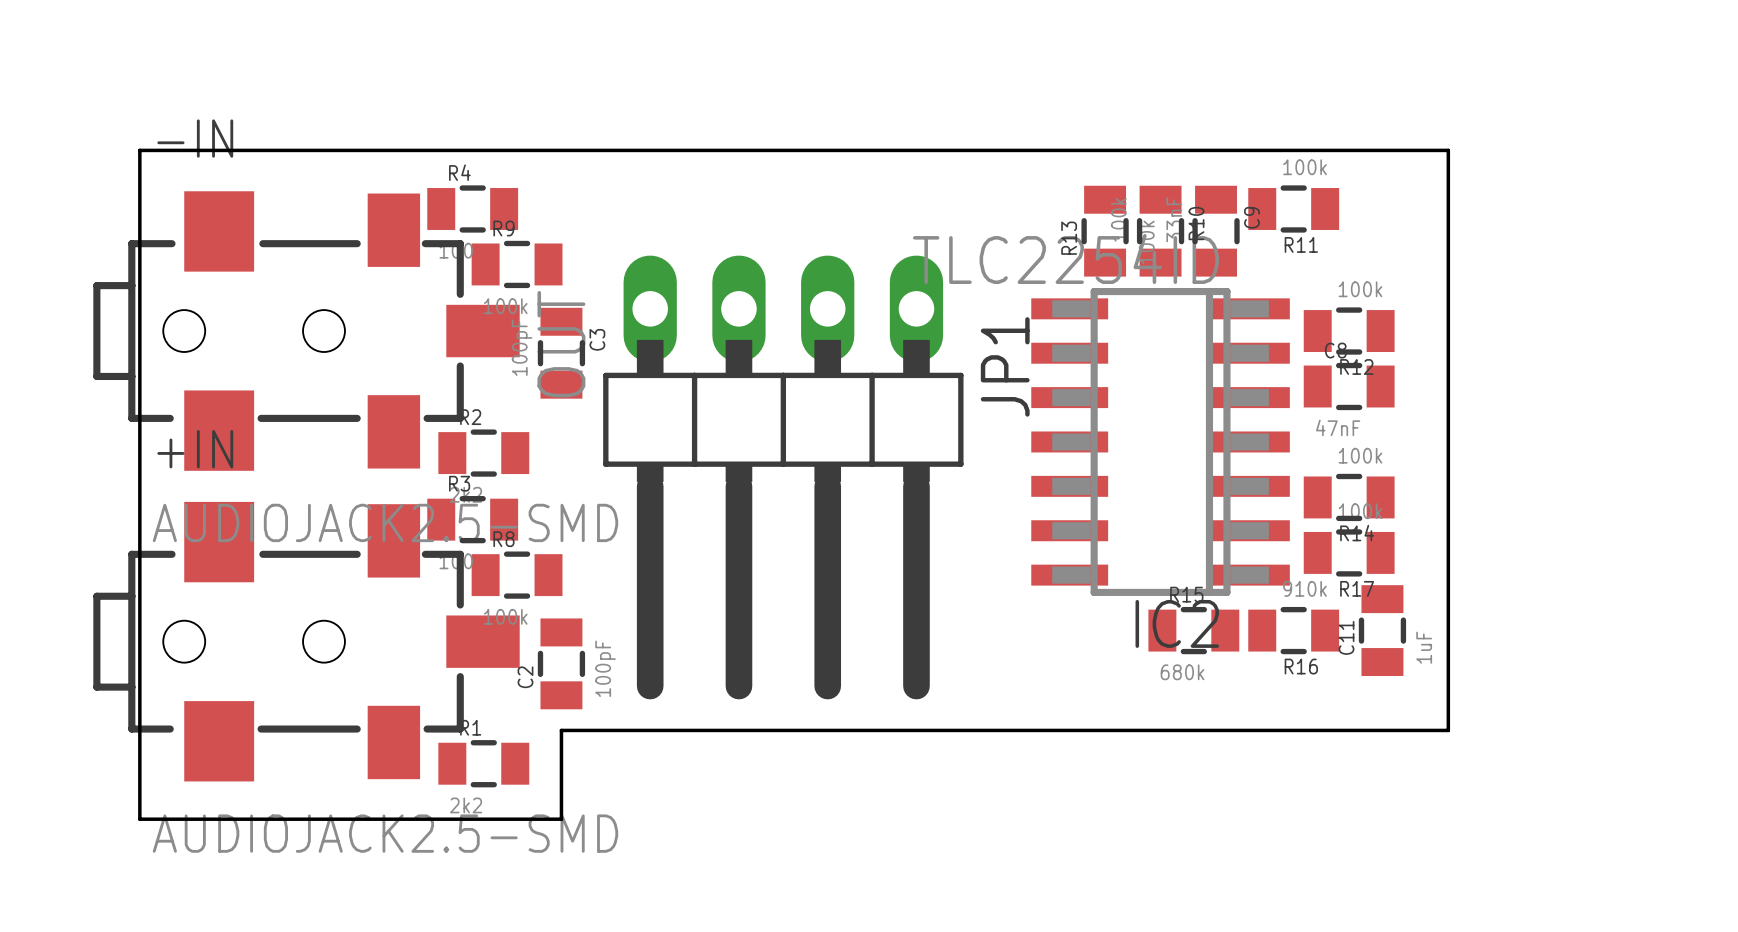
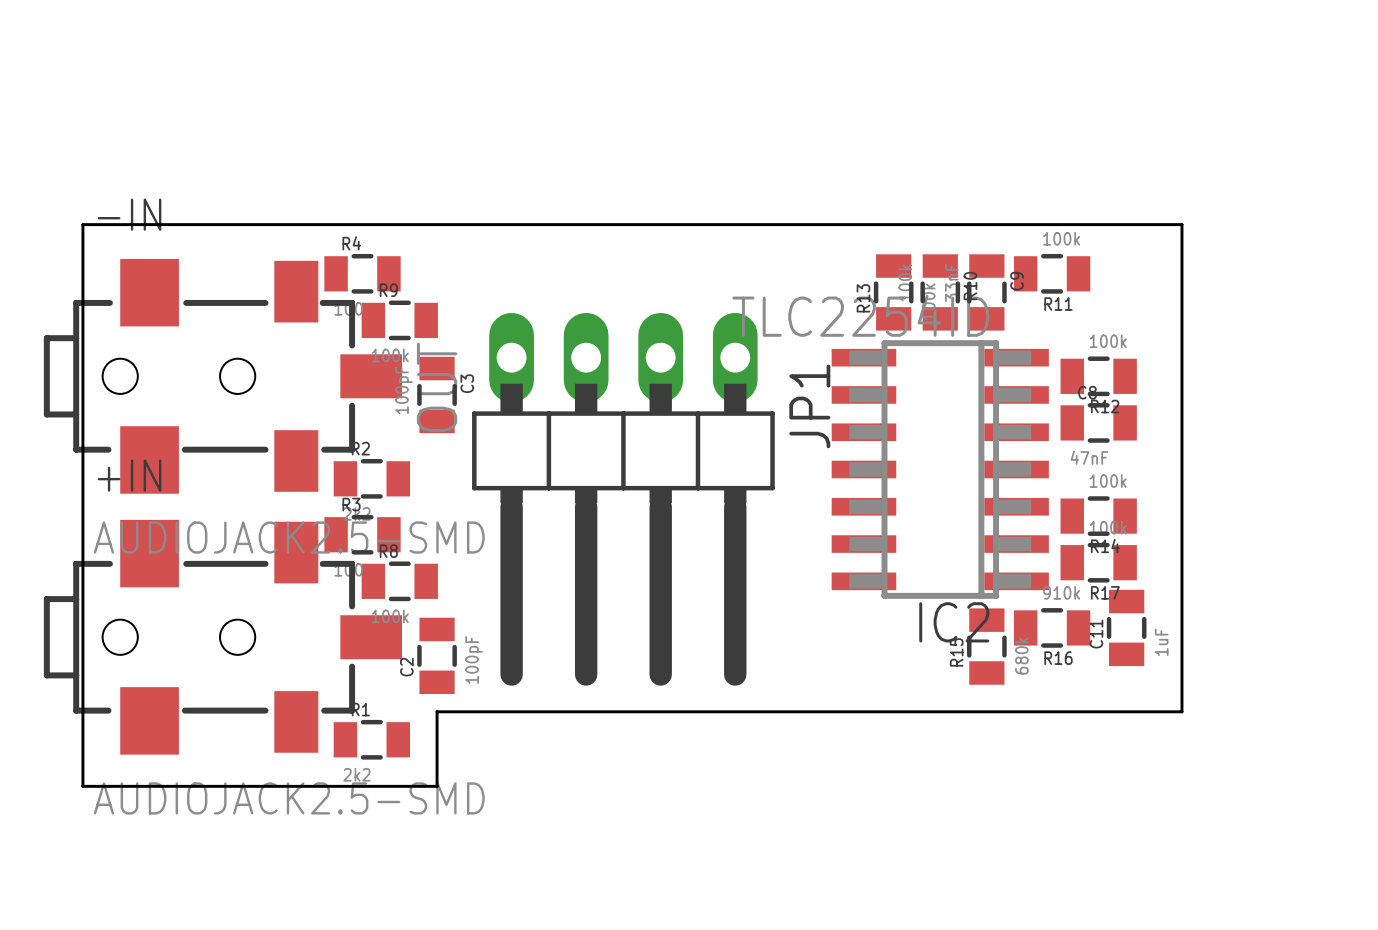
R15 rotation: 0° (1193, 630) -> 90° clockwise (986, 646)

